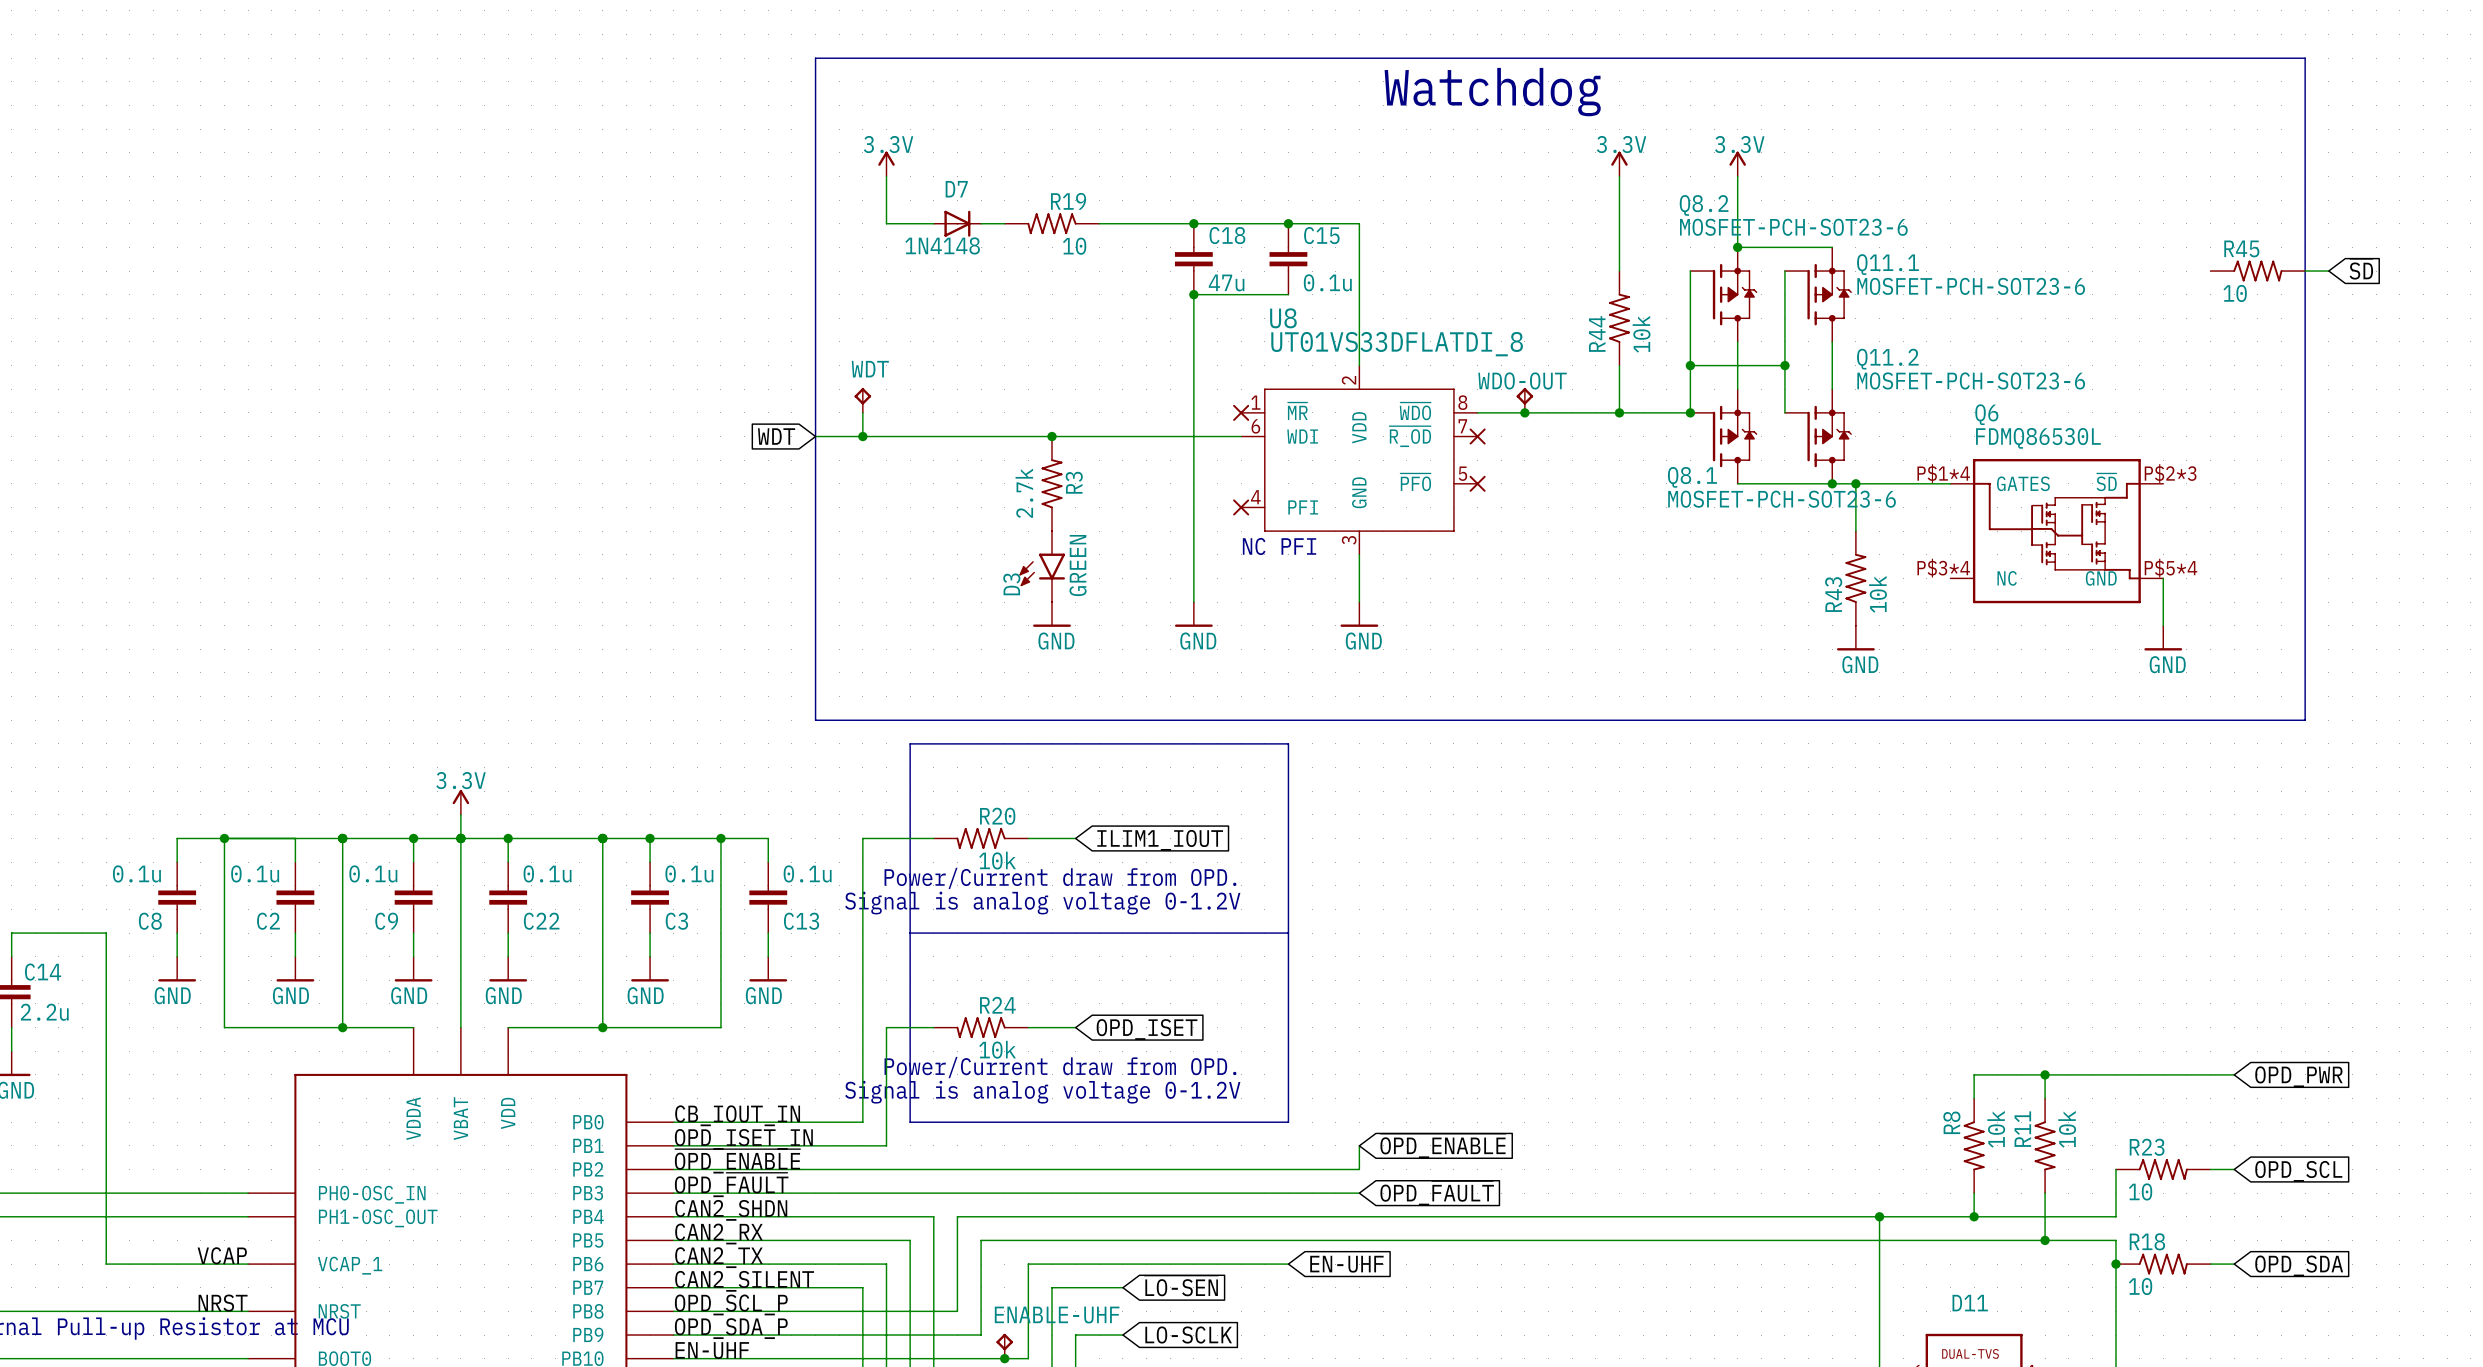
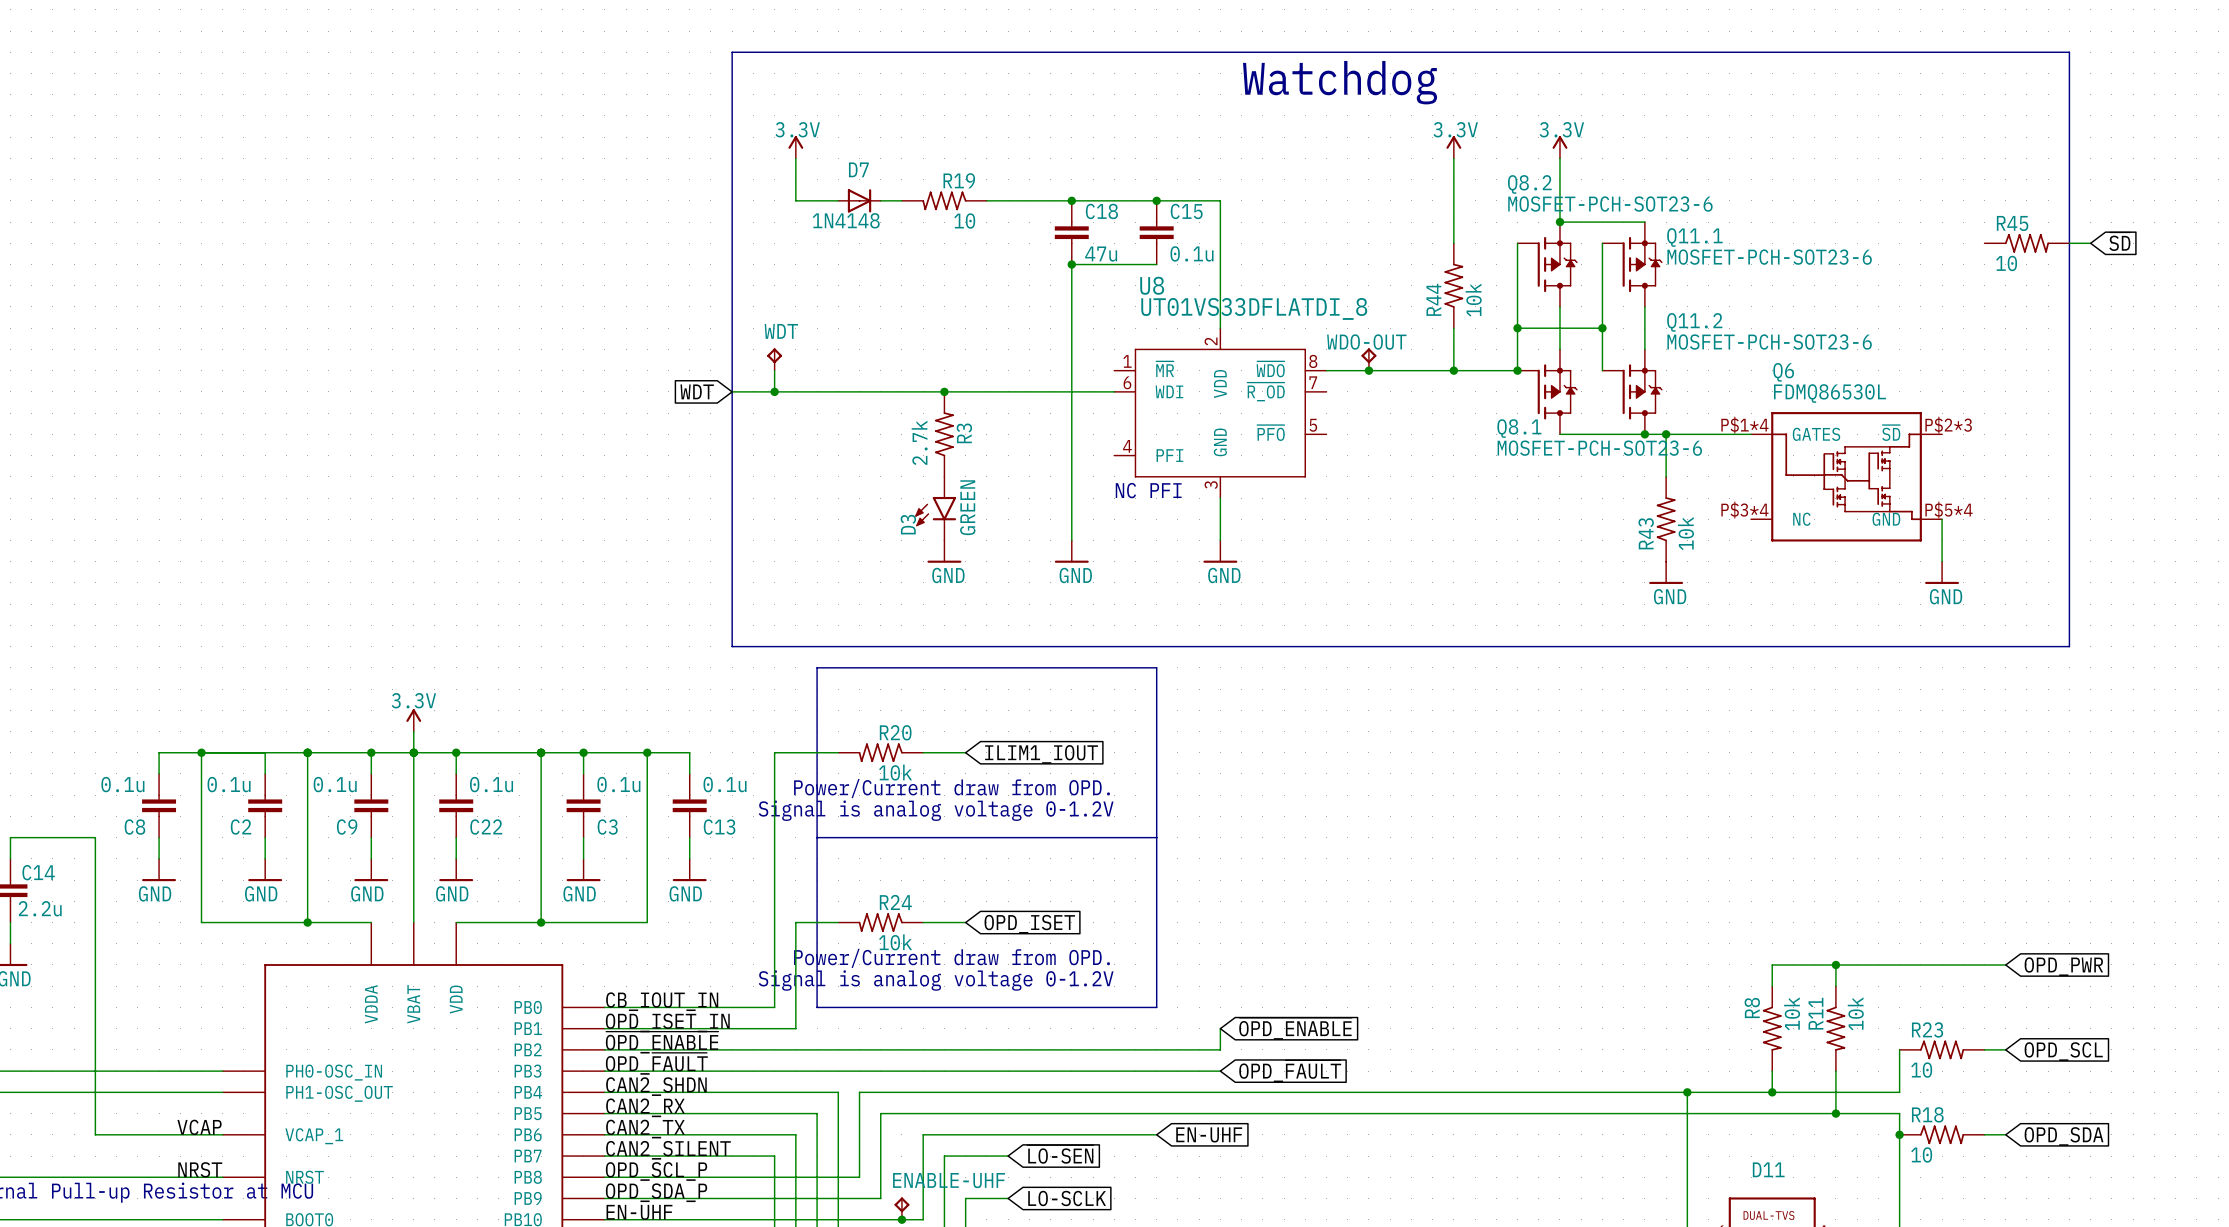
part: (1241, 412) -> none
part: (1477, 436) -> none
part: (1477, 483) -> none
part: (1241, 507) -> none

